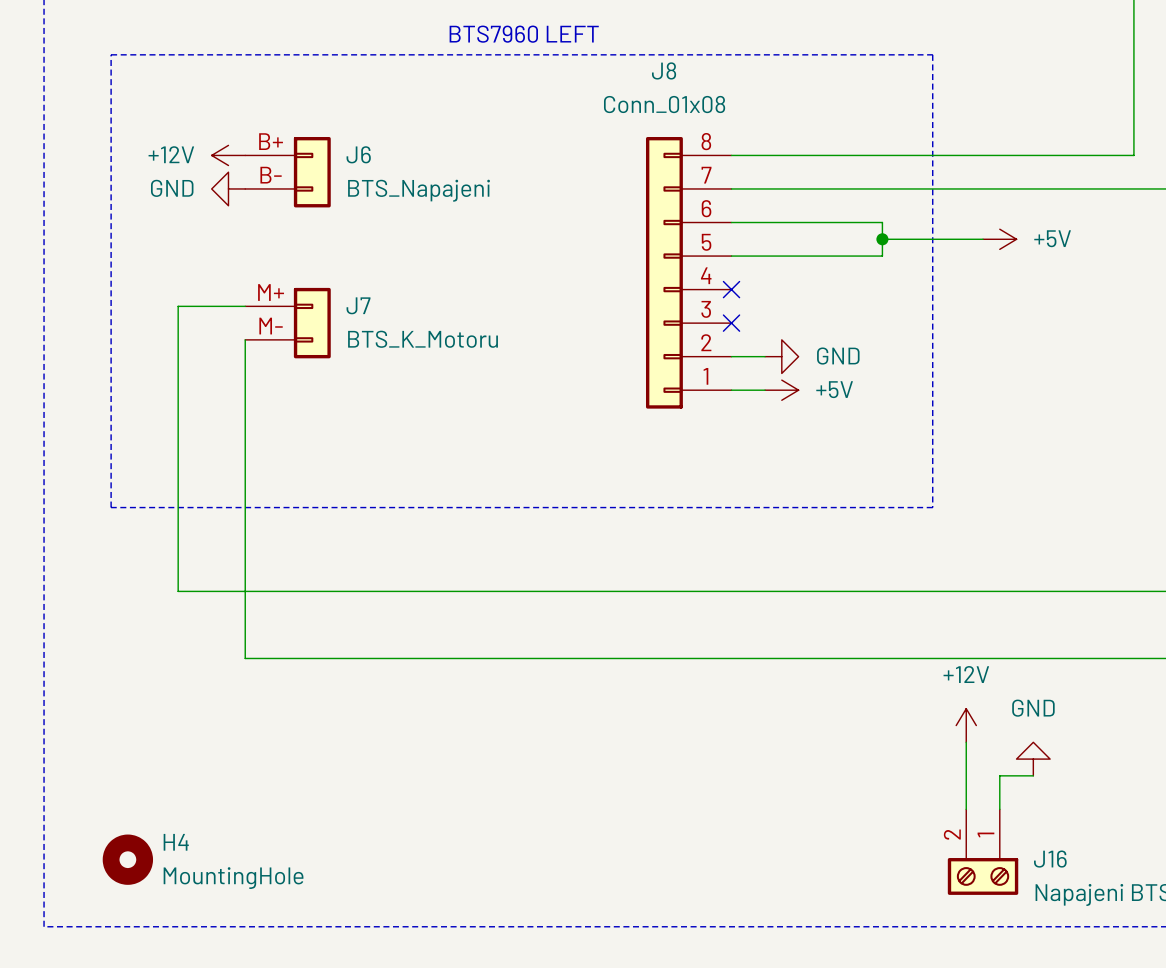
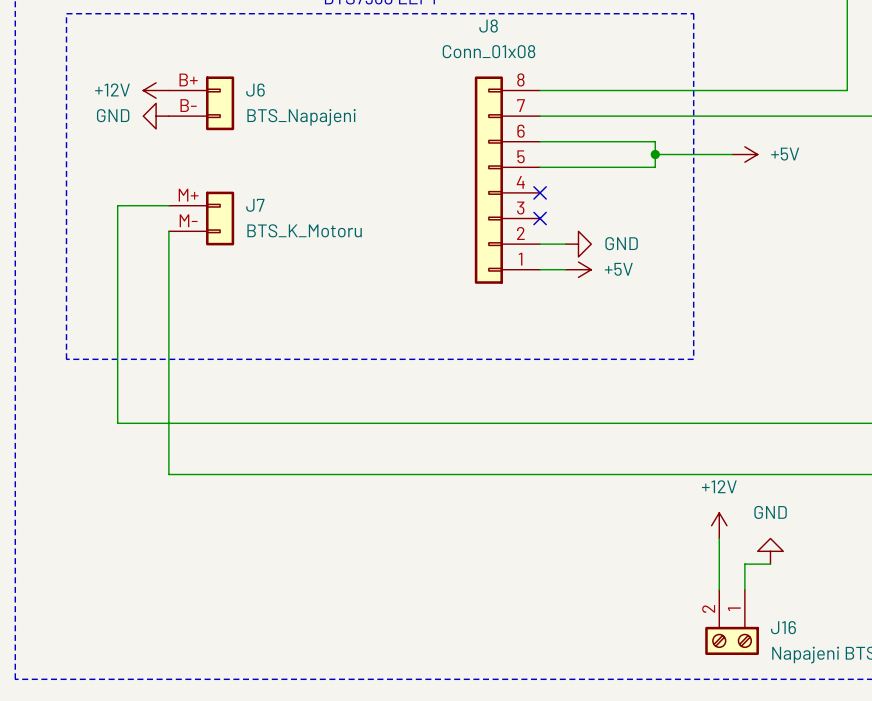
H4: MountingHole (127, 859) -> none

